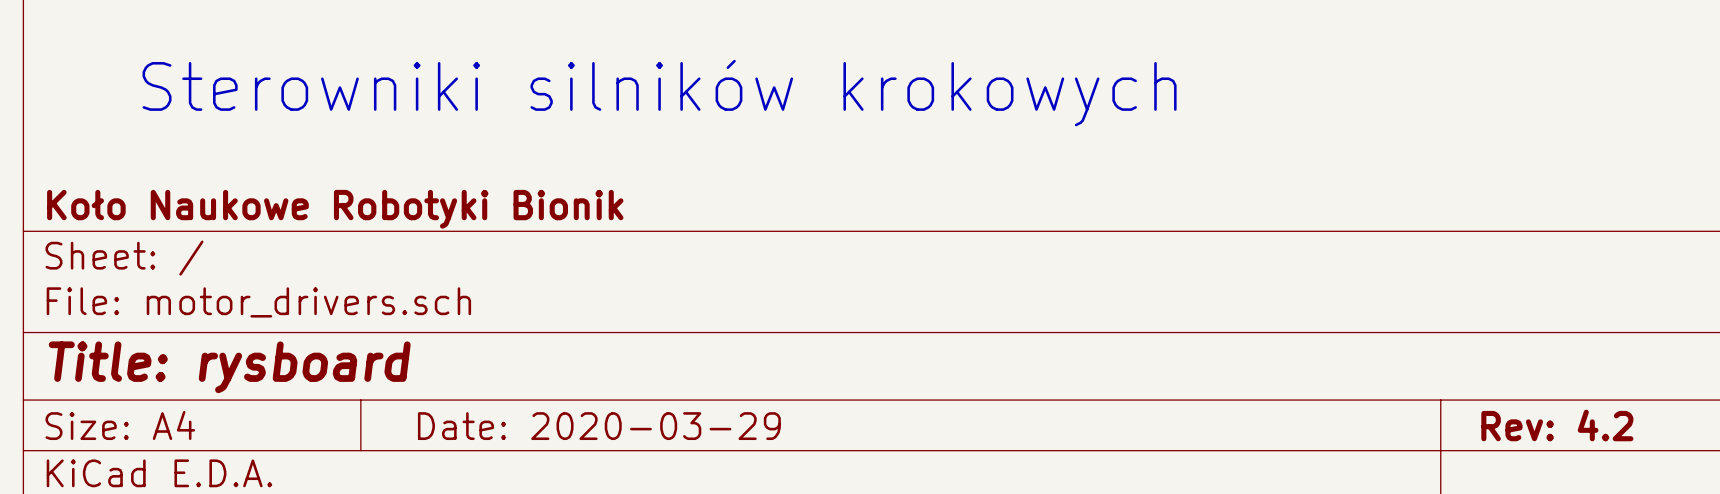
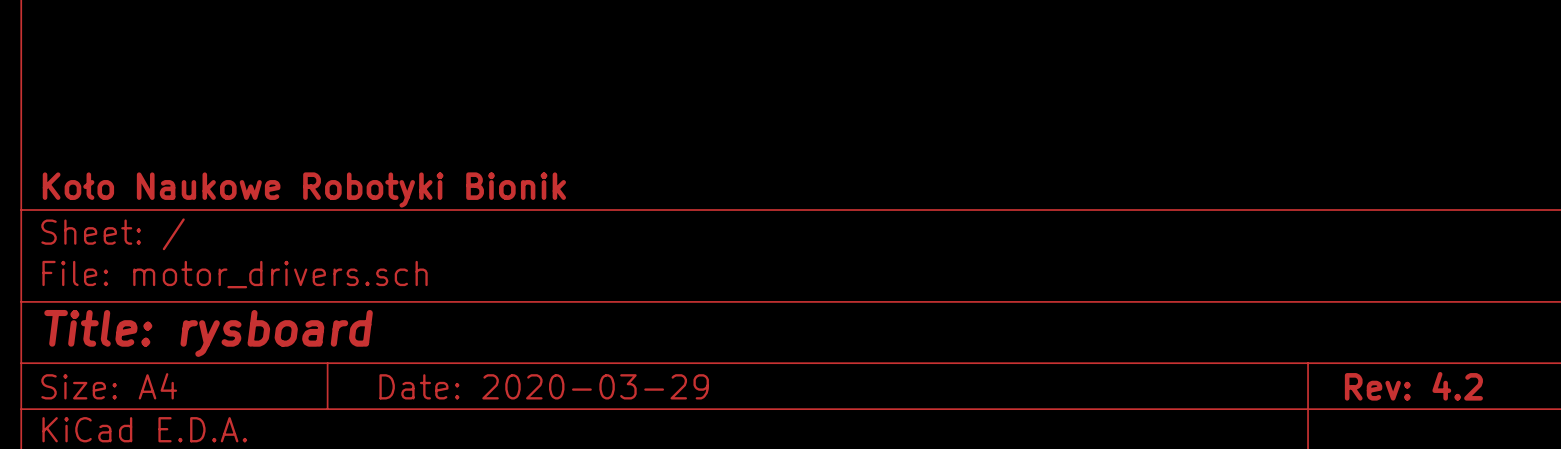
text: Sterowniki silników krokowych (659, 93) -> none

